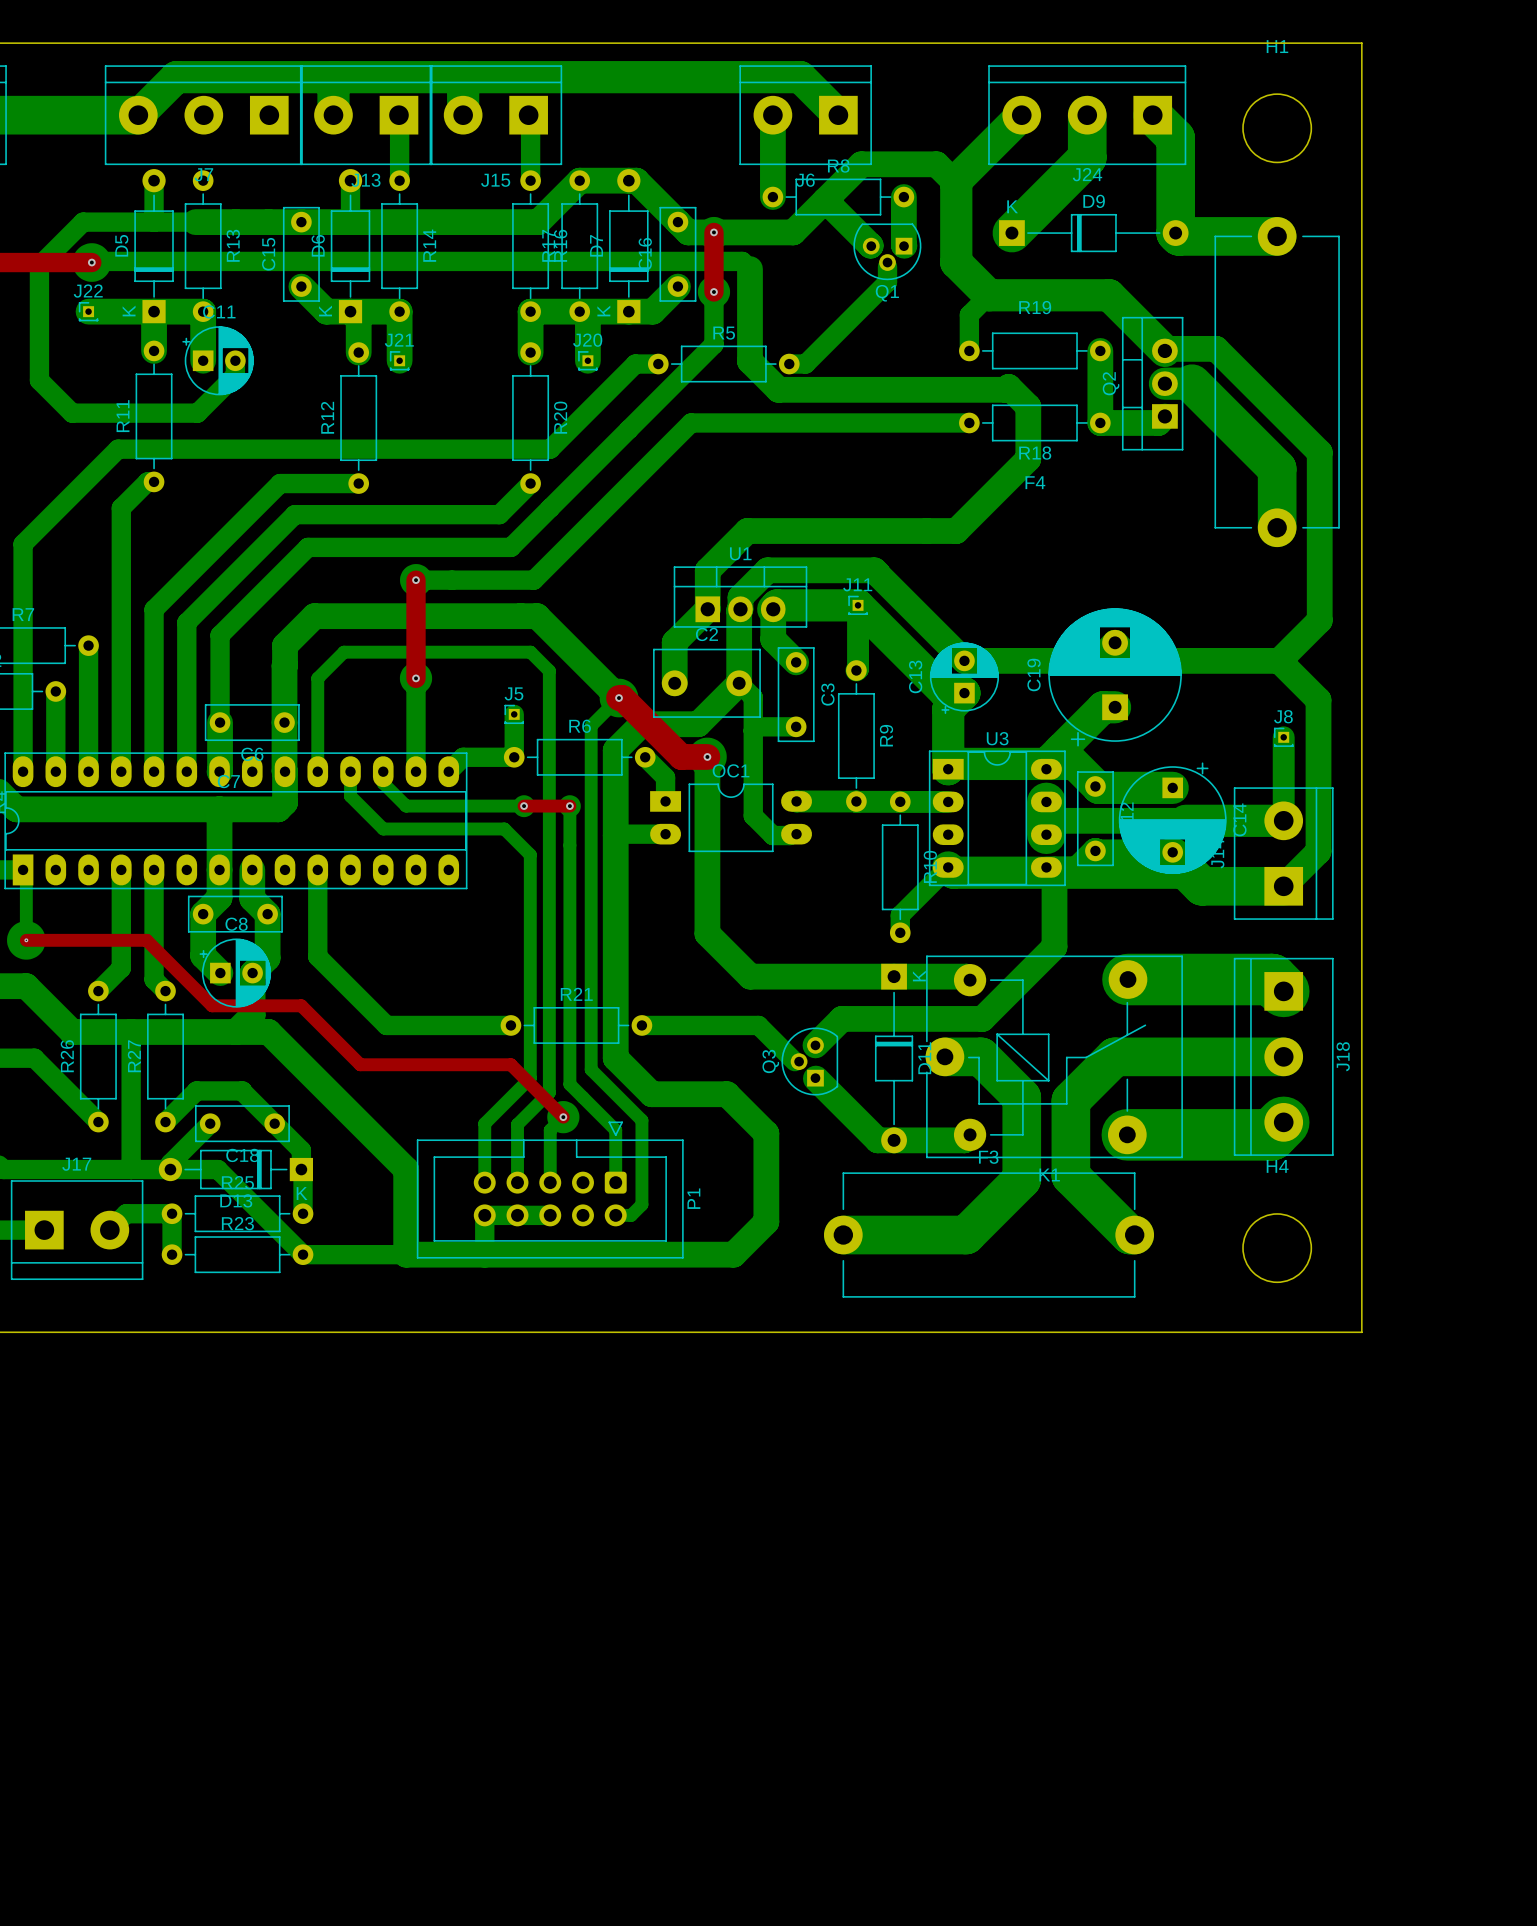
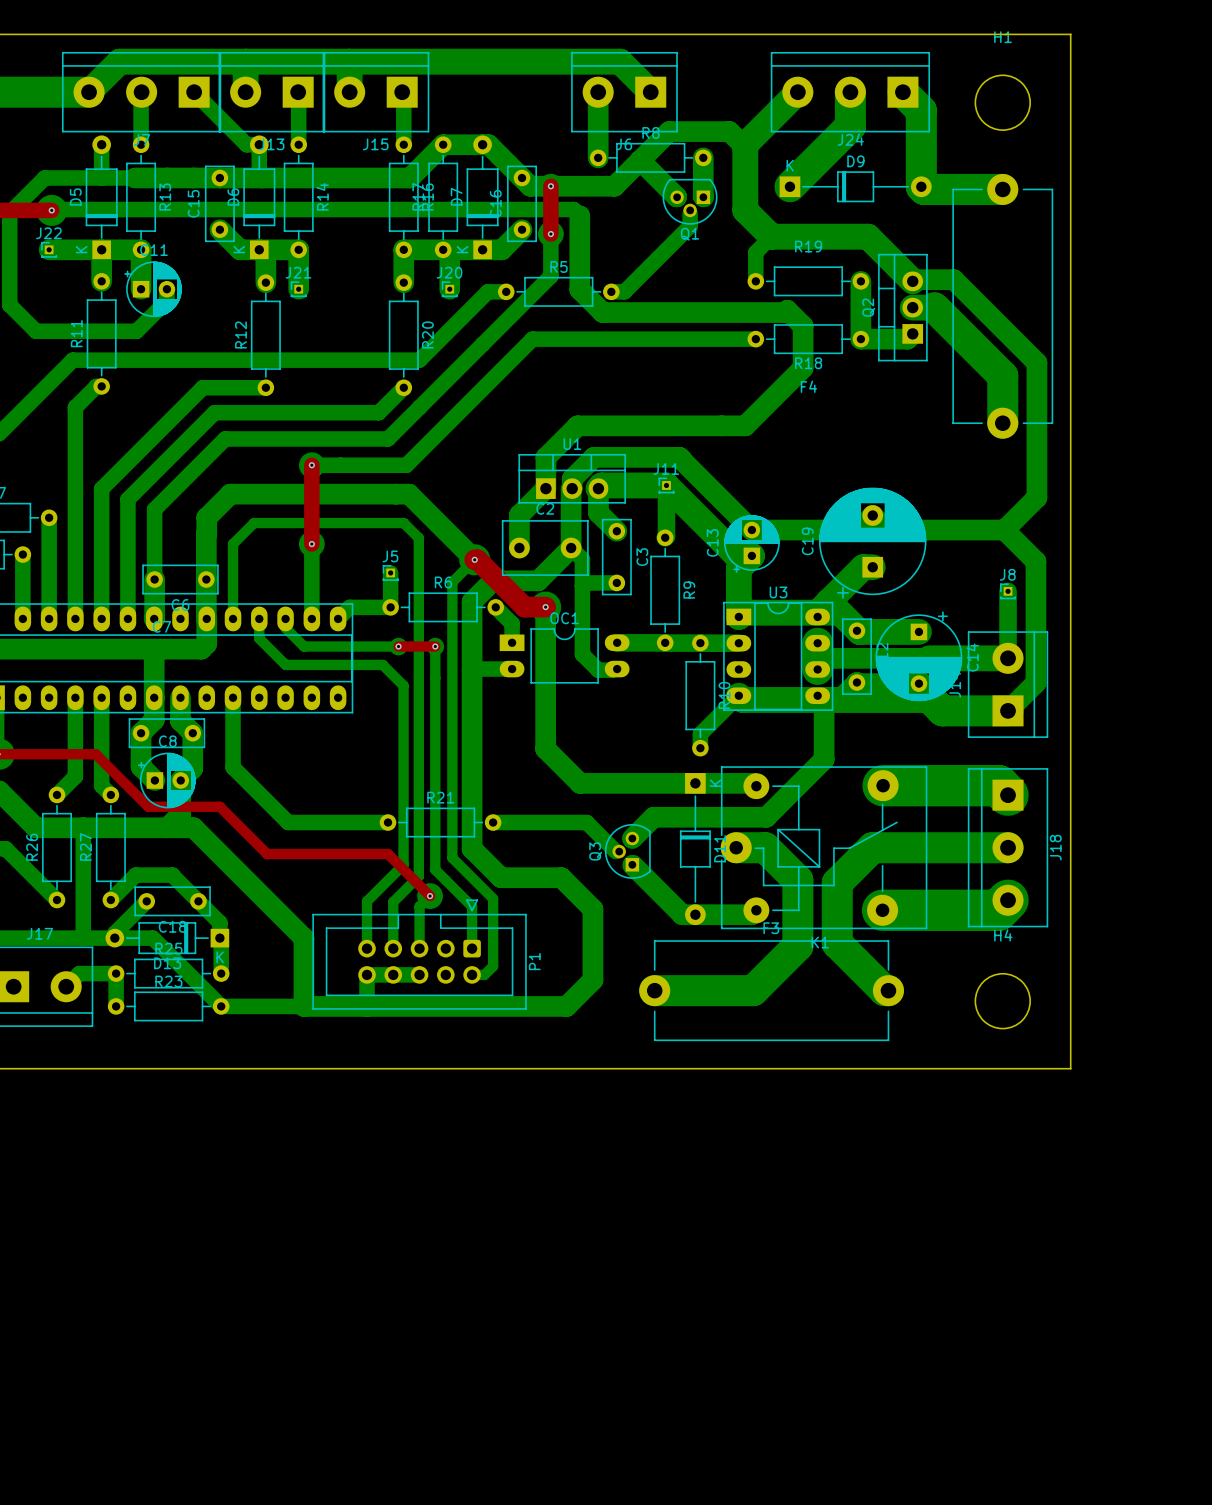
bottom track: none -> (141, 92) (141, 144)
bottom track: none -> (194, 92) (246, 144) (259, 144)

